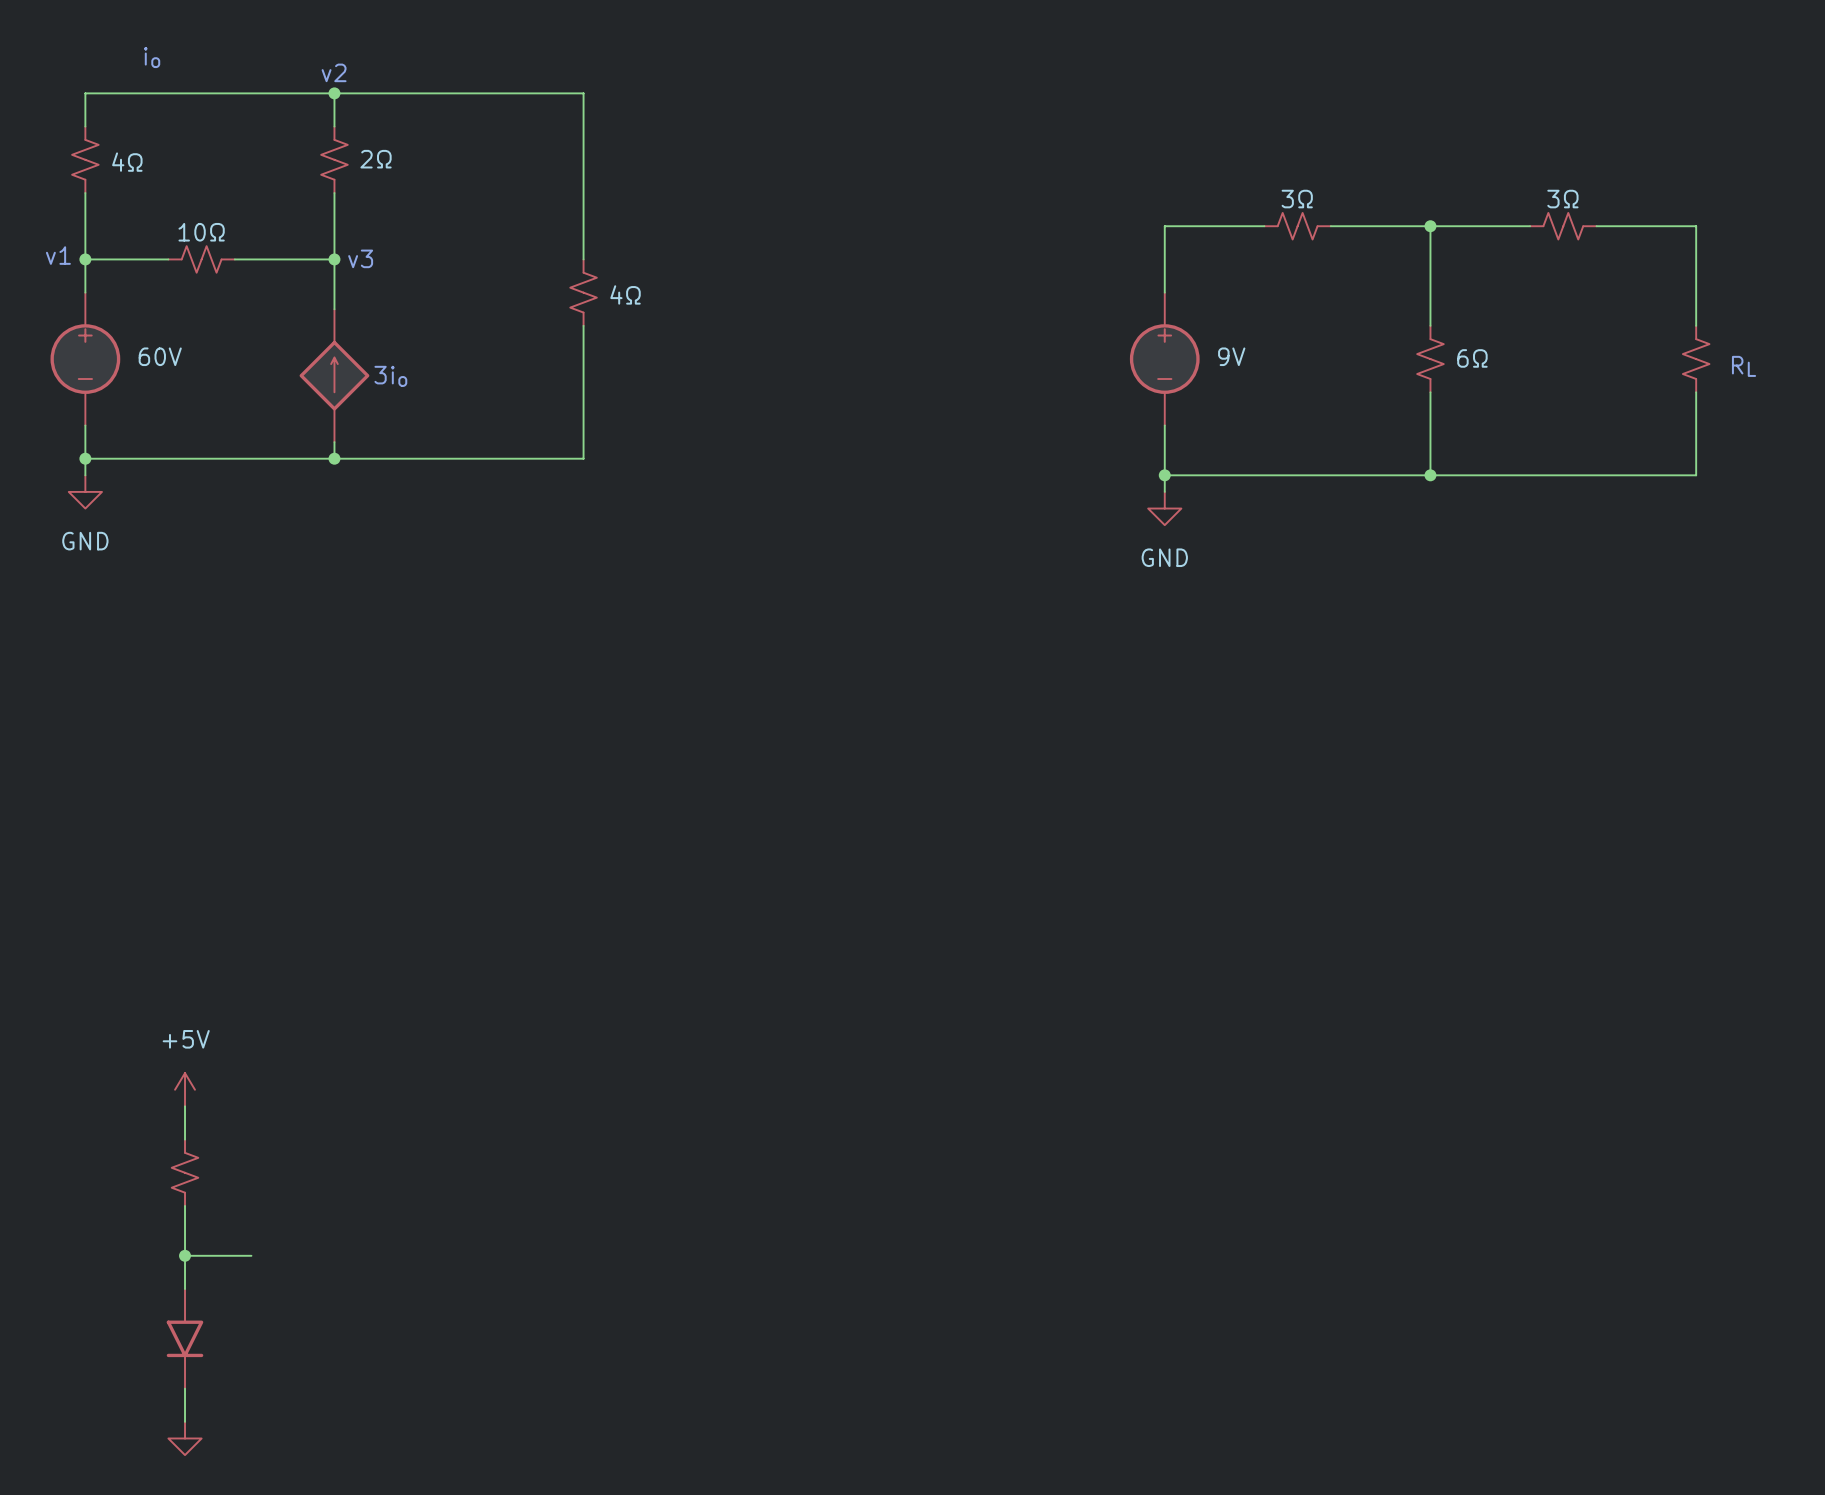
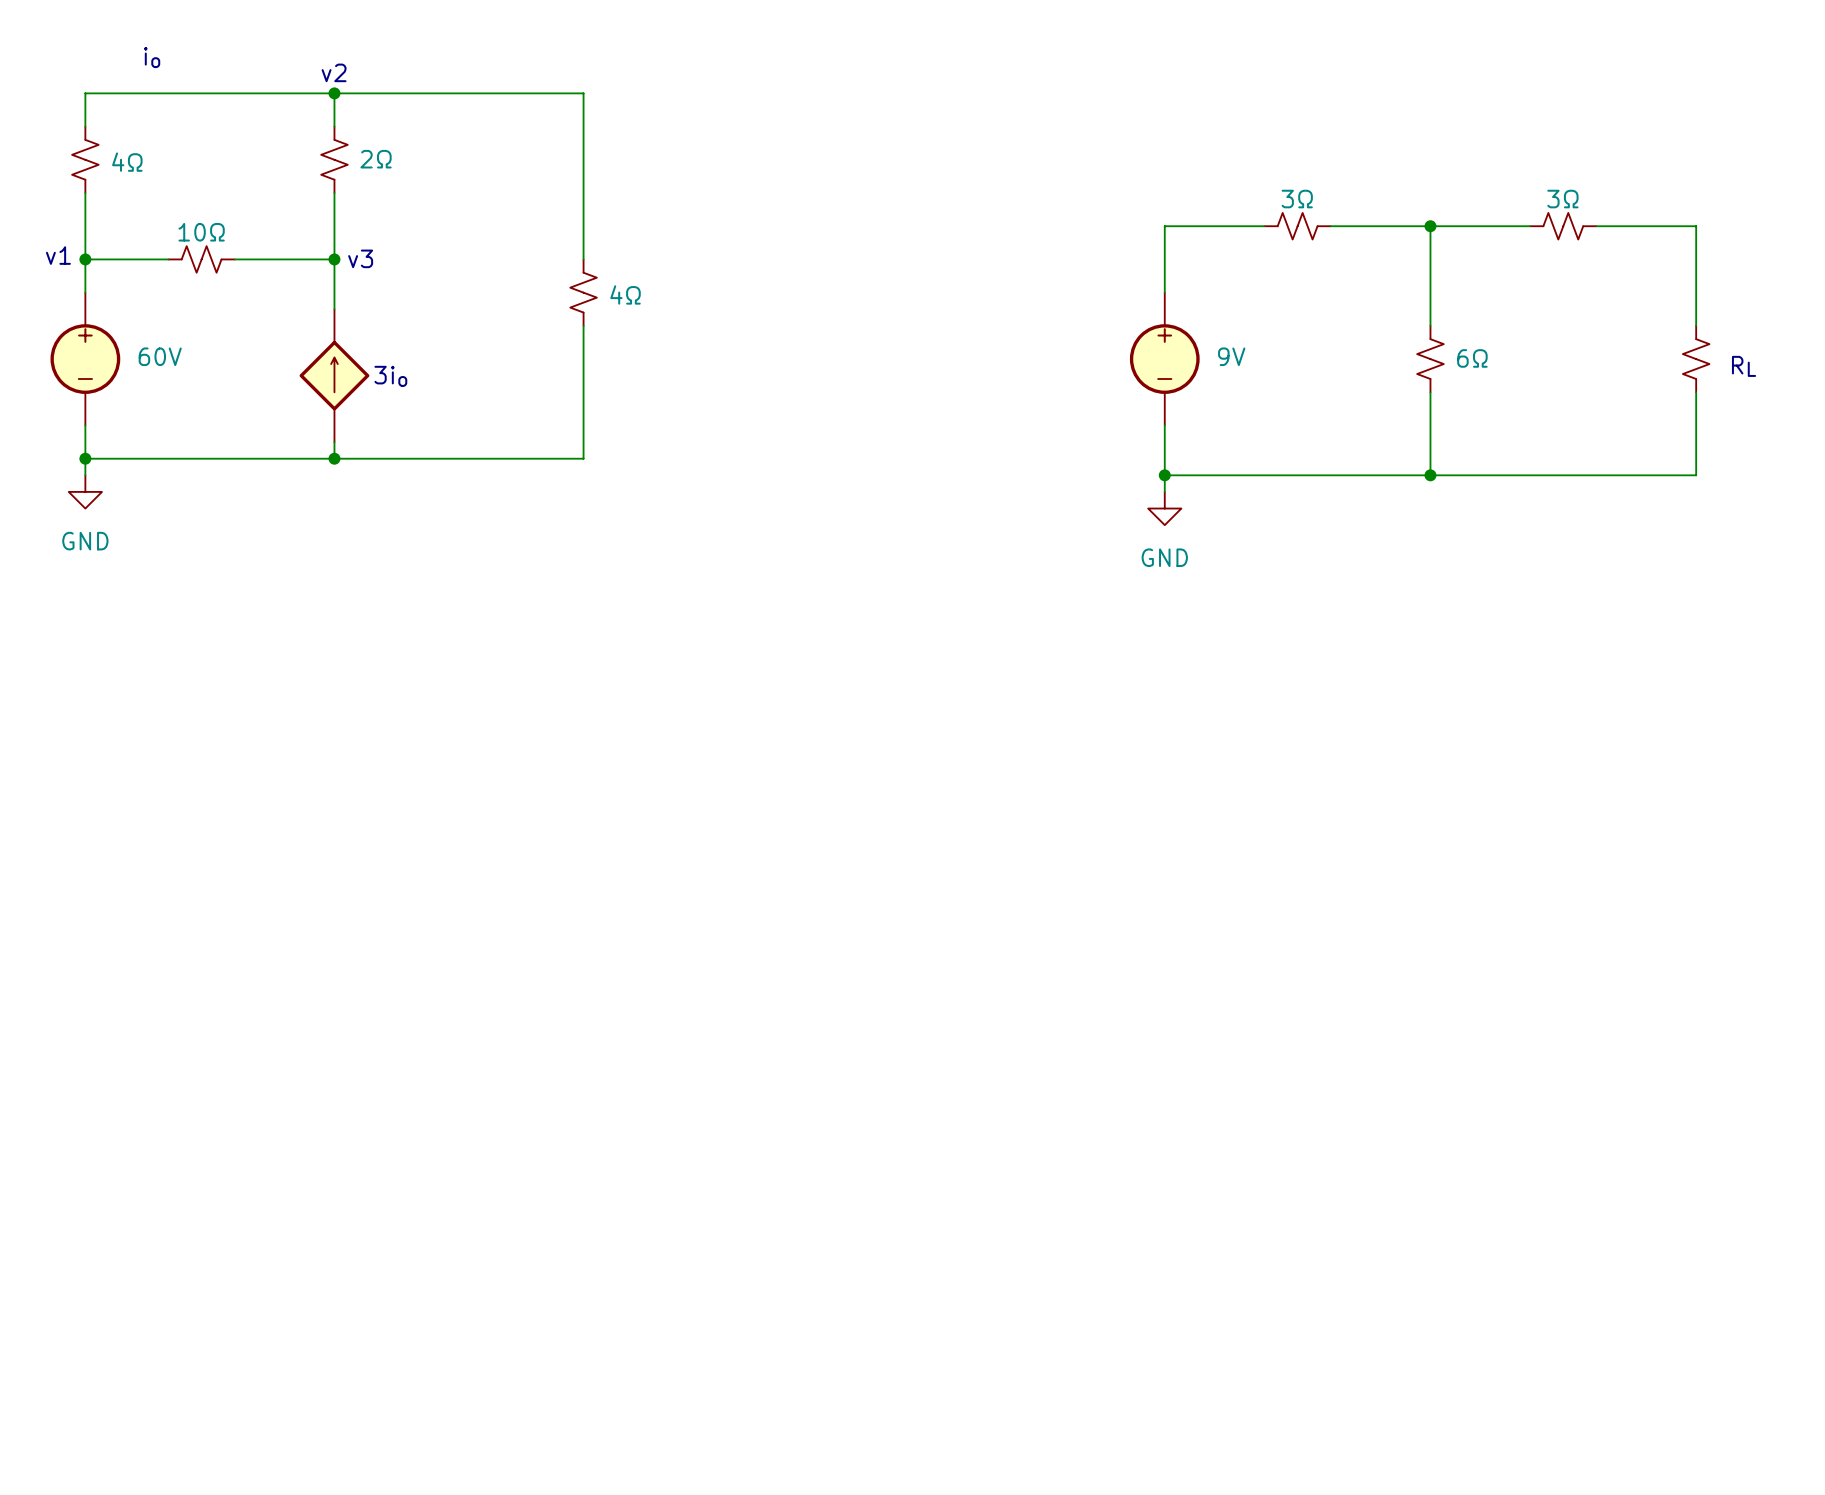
power symbol: +5V (185, 1089) -> none
wire: (185, 1106) (185, 1139) -> none
part: (185, 1172) -> none
wire: (185, 1205) (185, 1289) -> none
wire: (185, 1255) (251, 1255) -> none
junction: (185, 1255) -> none
part: (185, 1338) -> none
wire: (185, 1388) (185, 1421) -> none
power symbol: (185, 1438) -> none

